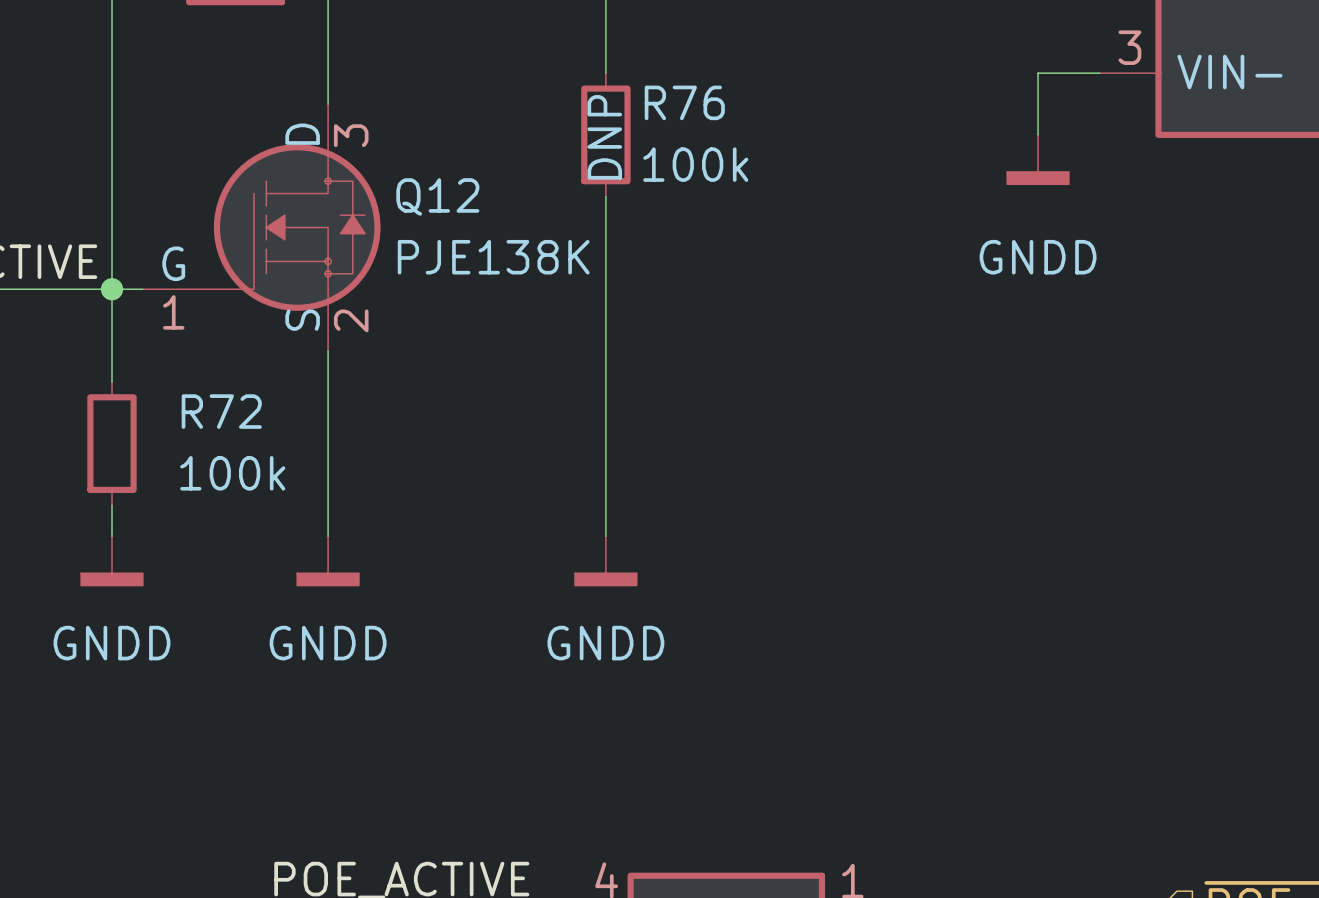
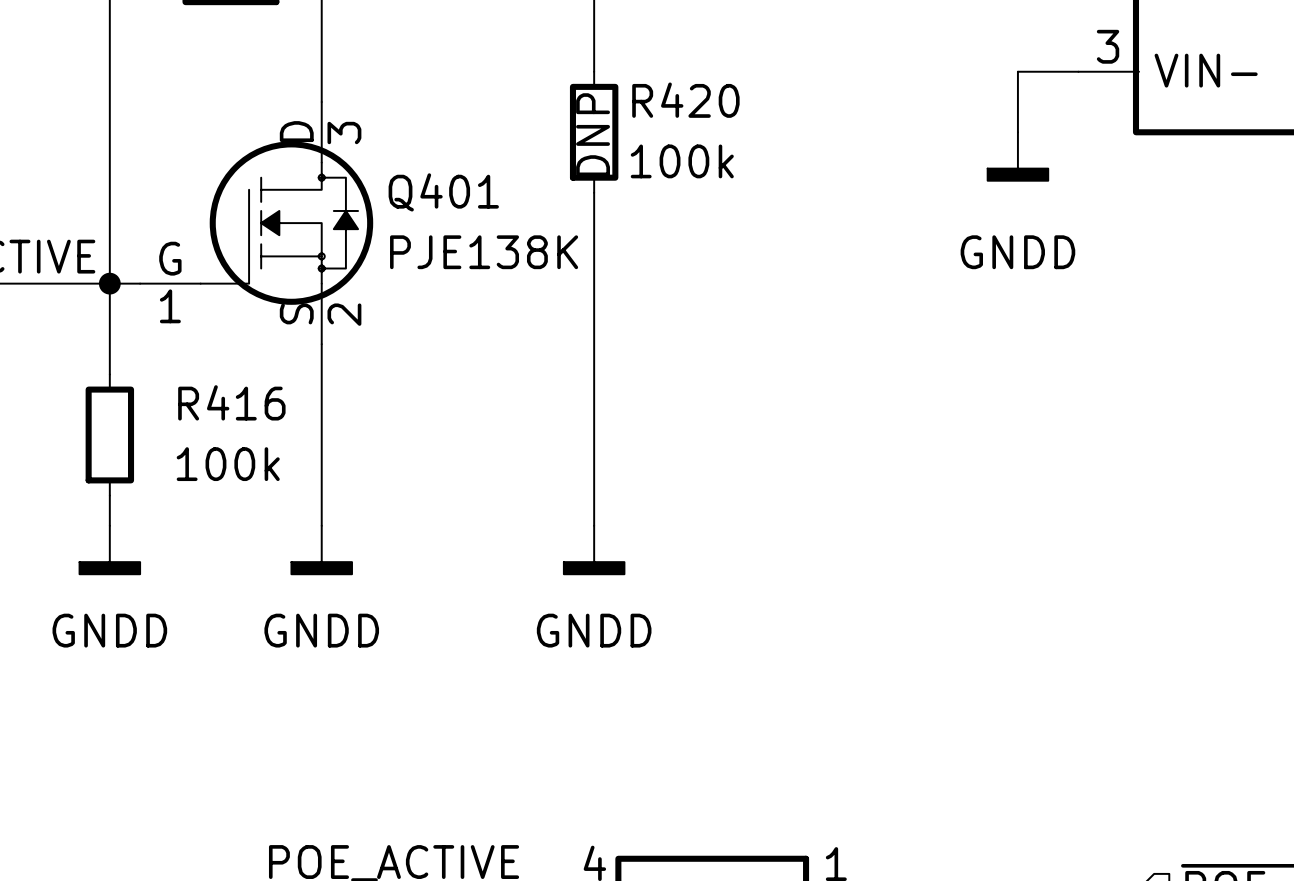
R76 name: R76 (684, 102) -> R420 (685, 100)
Q12 name: Q12 (437, 196) -> Q401 (443, 192)
R72 name: R72 (221, 411) -> R416 (231, 402)

